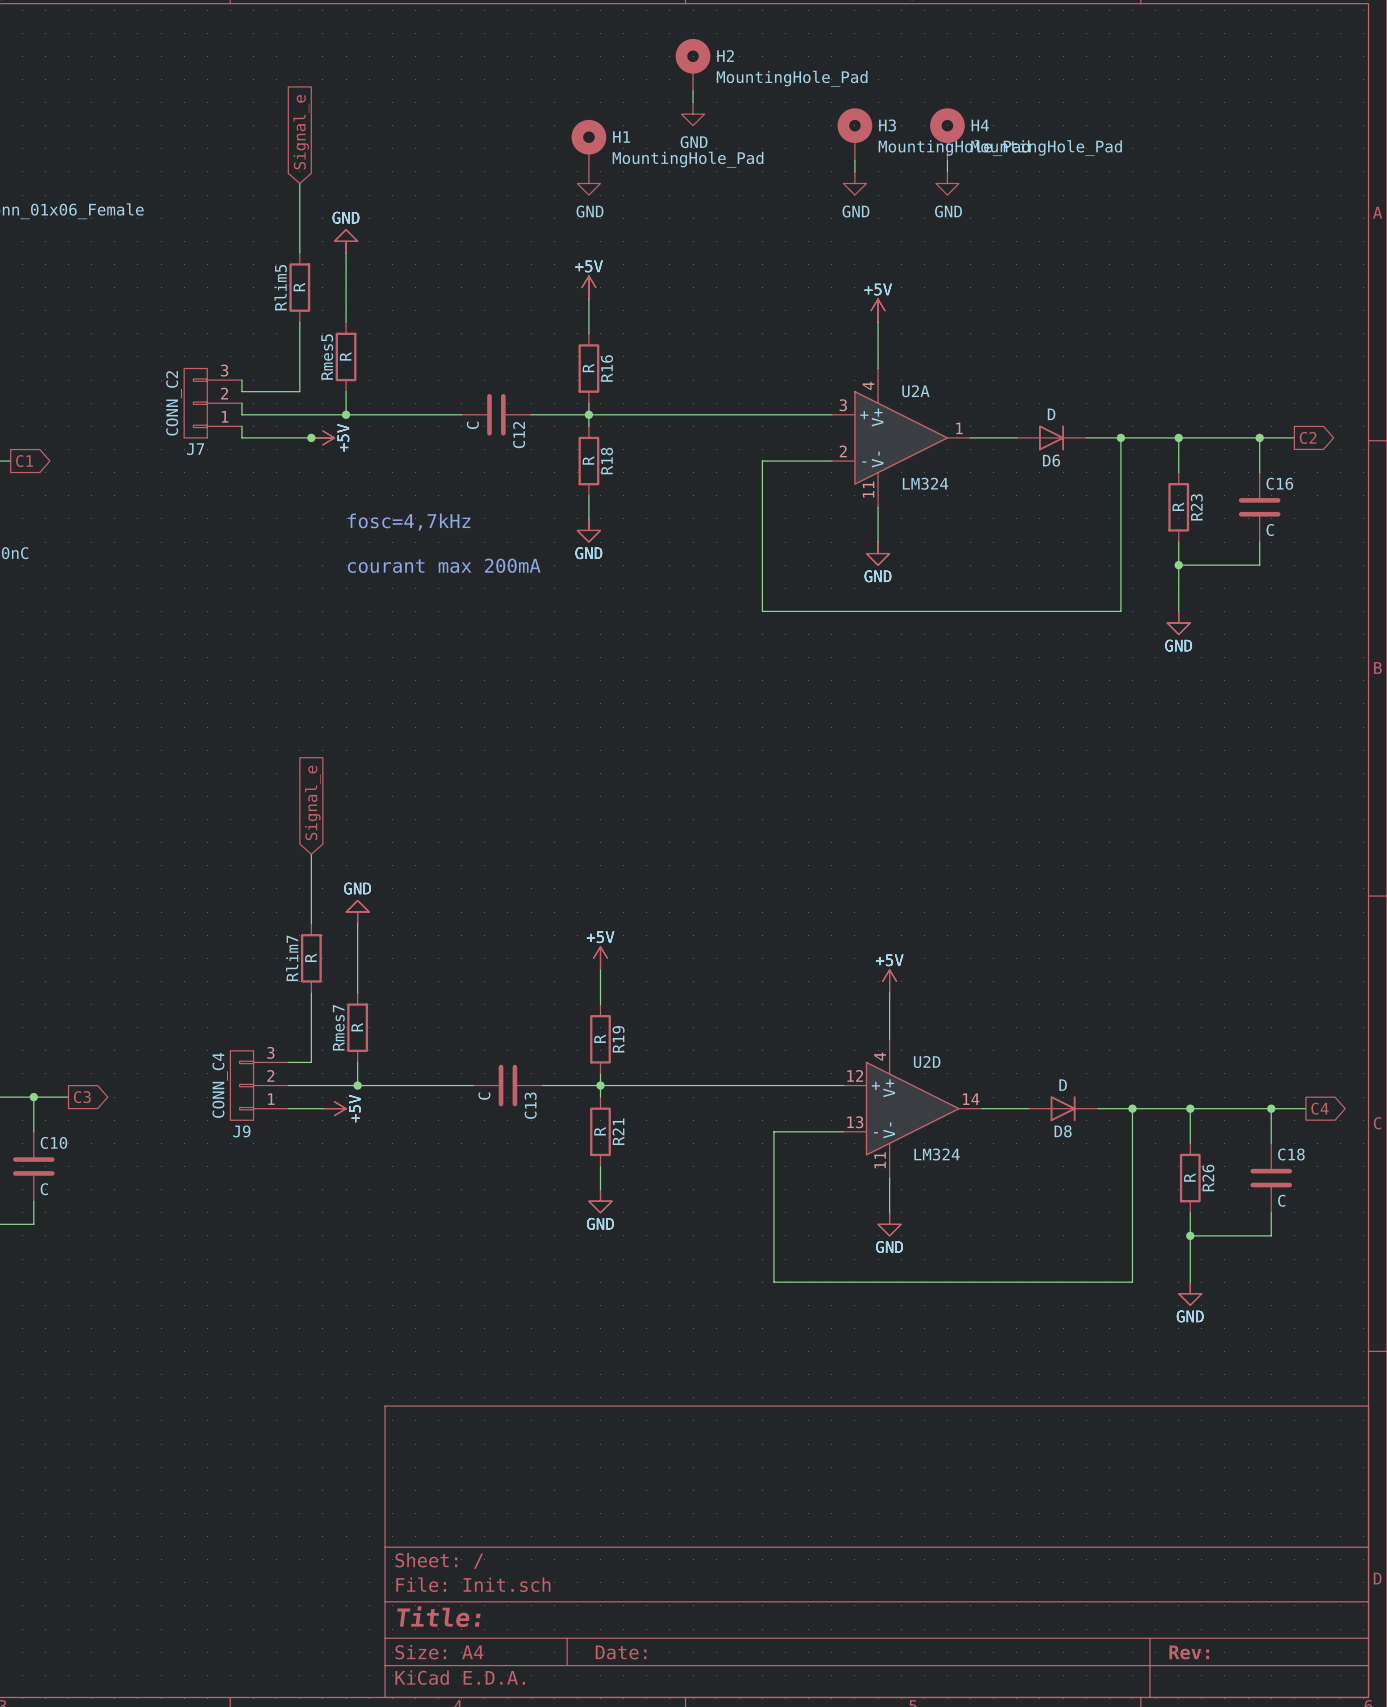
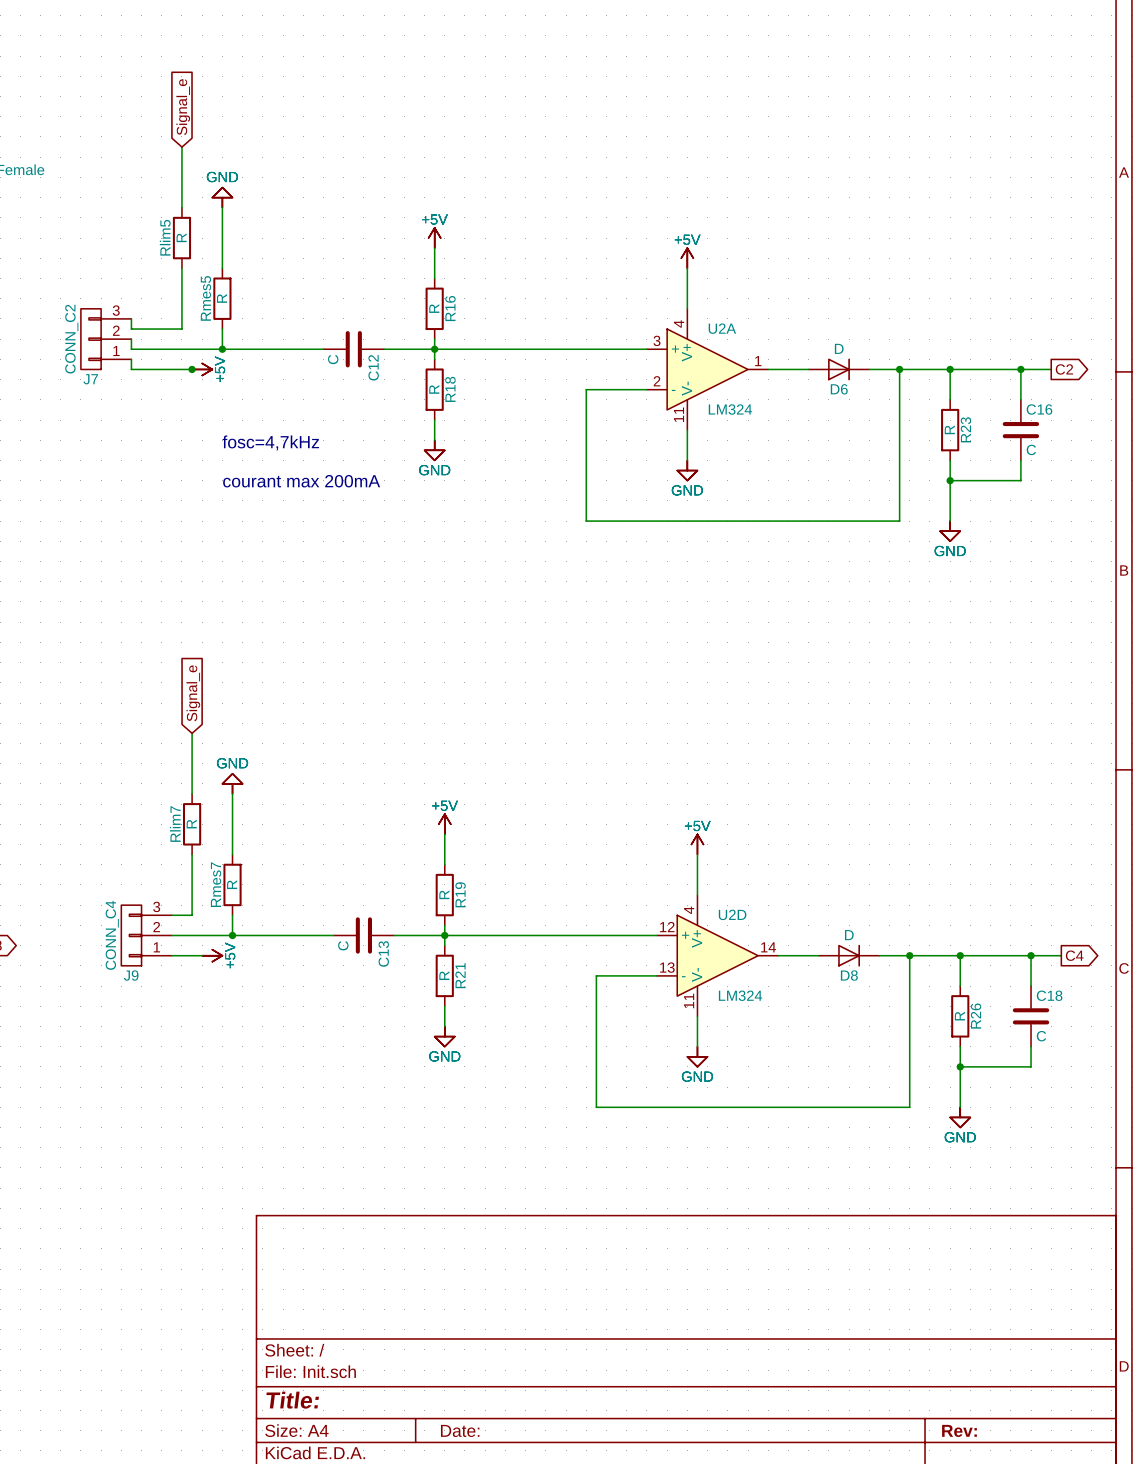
H2: MountingHole_Pad (693, 64) -> none
wire: (693, 90) (693, 102) -> none
power symbol: GND (693, 114) -> none
H3: MountingHole_Pad (854, 134) -> none
H4: MountingHole_Pad (947, 134) -> none
H1: MountingHole_Pad (588, 145) -> none
wire: (854, 160) (854, 171) -> none
wire: (947, 160) (947, 171) -> none
power symbol: GND (588, 183) -> none
power symbol: GND (854, 183) -> none
power symbol: GND (947, 183) -> none

